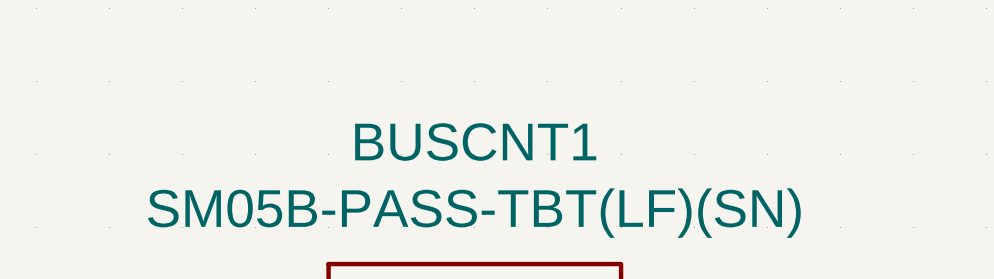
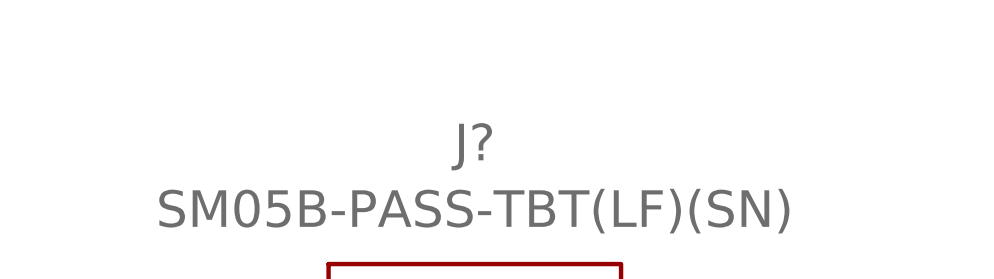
BUSCNT1 name: BUSCNT1 (475, 142) -> J? (471, 146)

